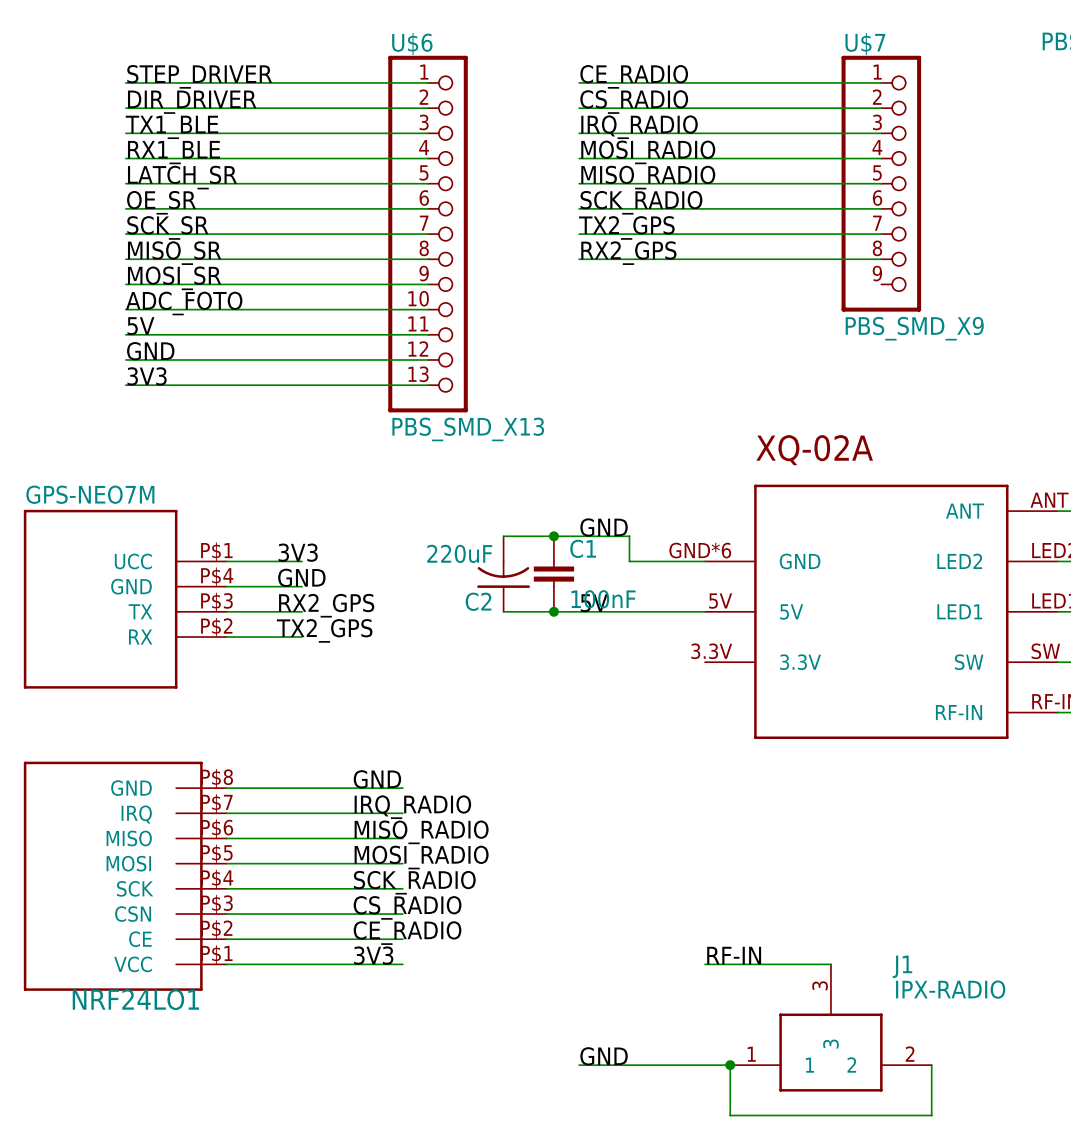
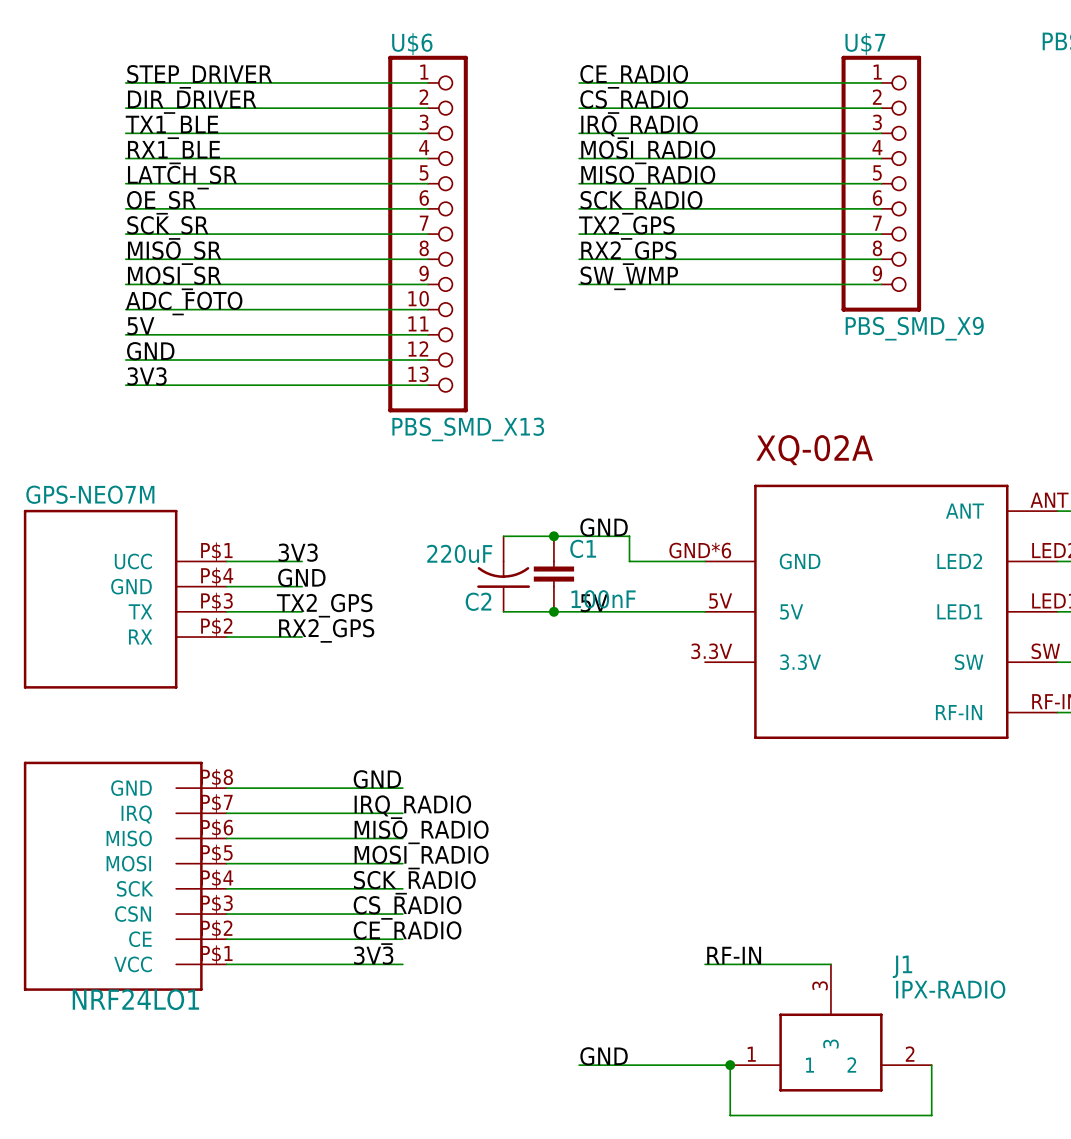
label: none -> SW_WMP (629, 278)
wire: none -> (579, 284) (881, 284)
label: RX2_GPS (326, 605) -> TX2_GPS (324, 605)
label: TX2_GPS (324, 630) -> RX2_GPS (326, 630)

